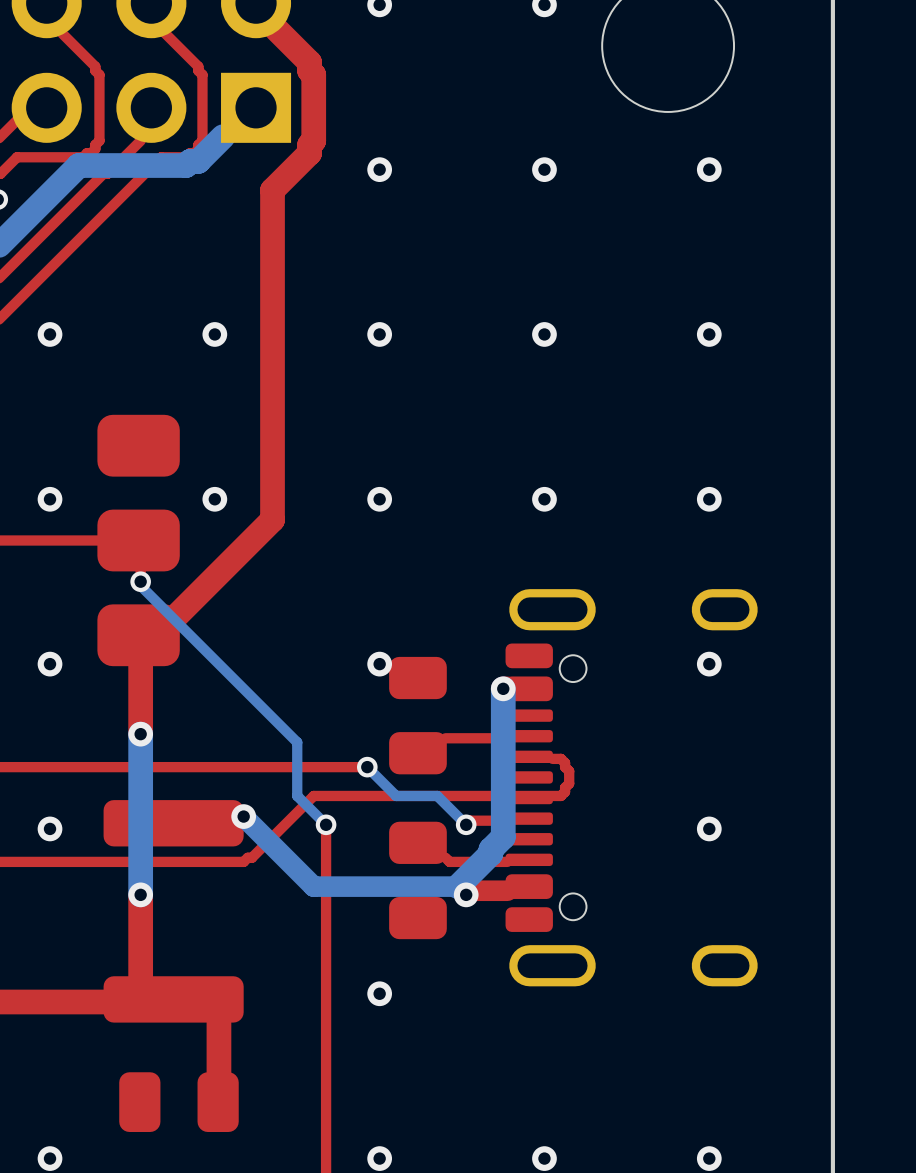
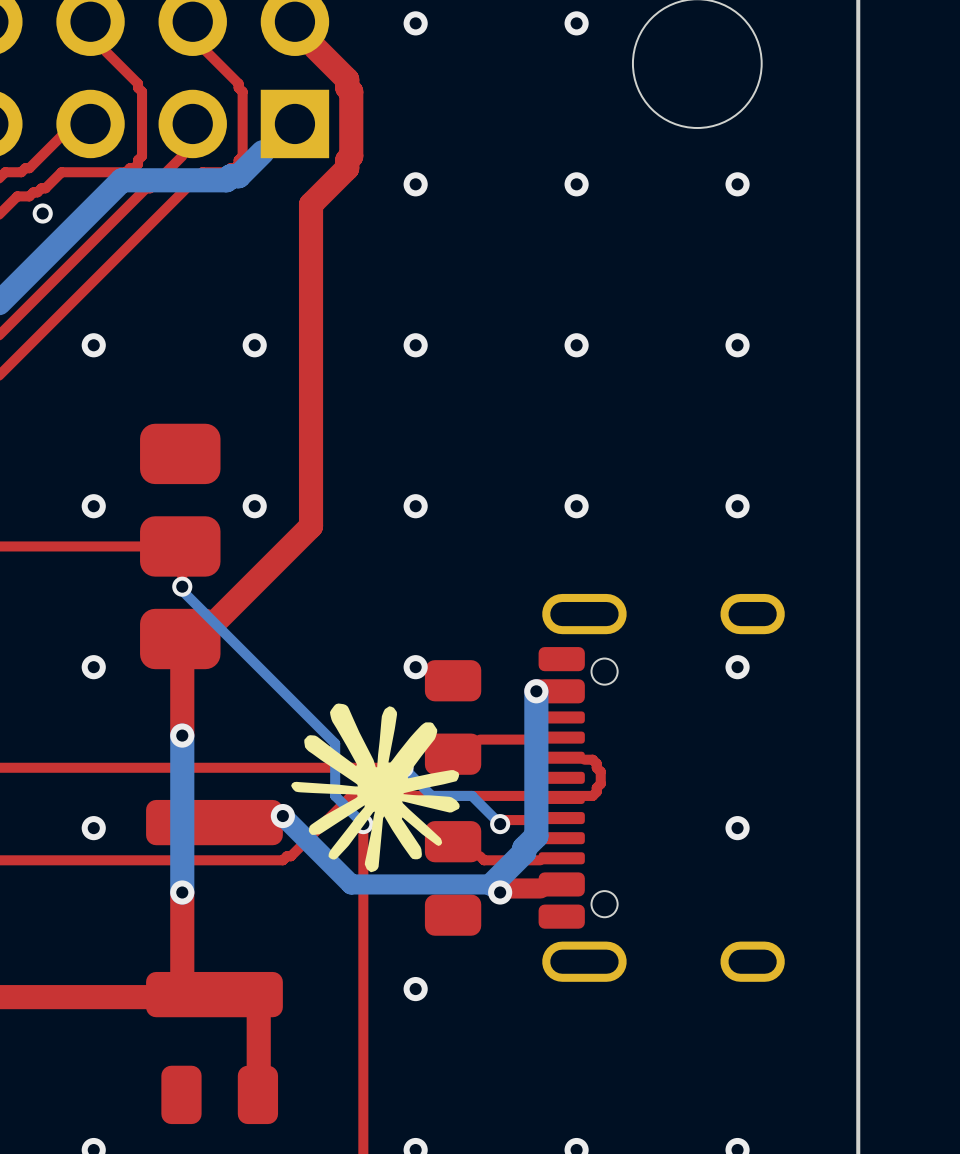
drawing: none -> [291, 703, 460, 873]

